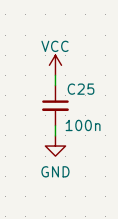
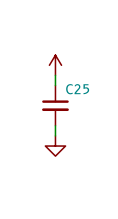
power symbol text: VCC (54, 46) -> none
C25 value: 100n (83, 125) -> none
power symbol text: GND (55, 171) -> none

